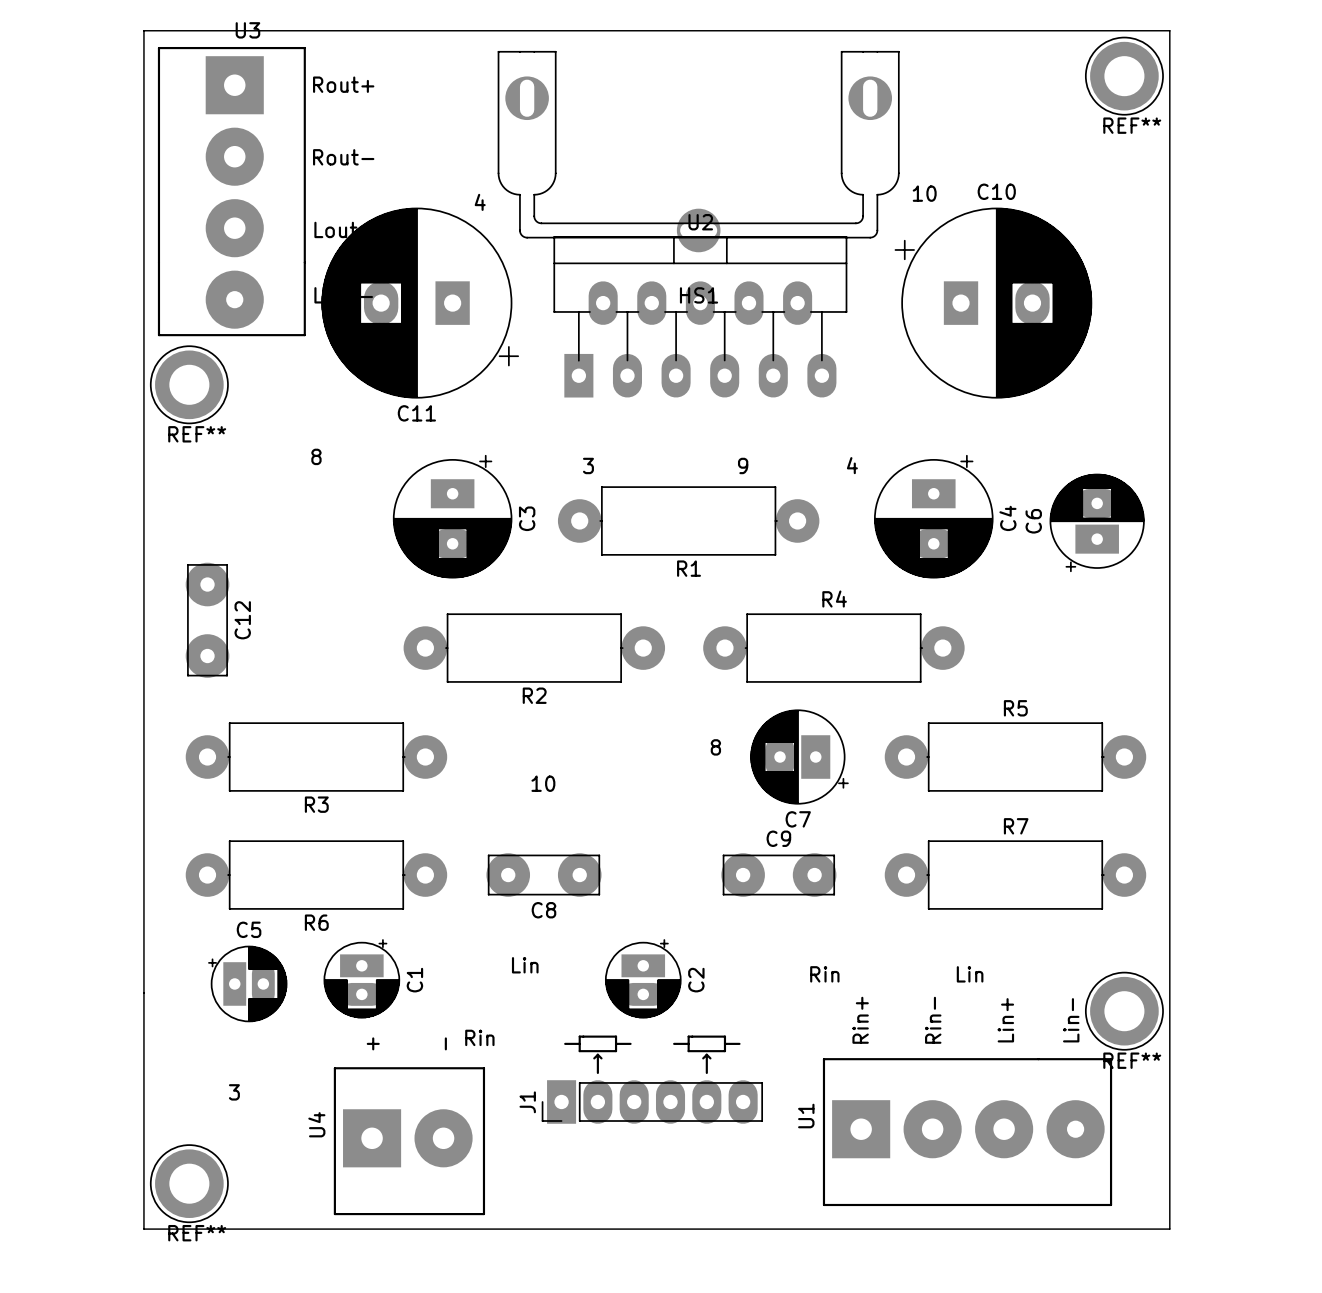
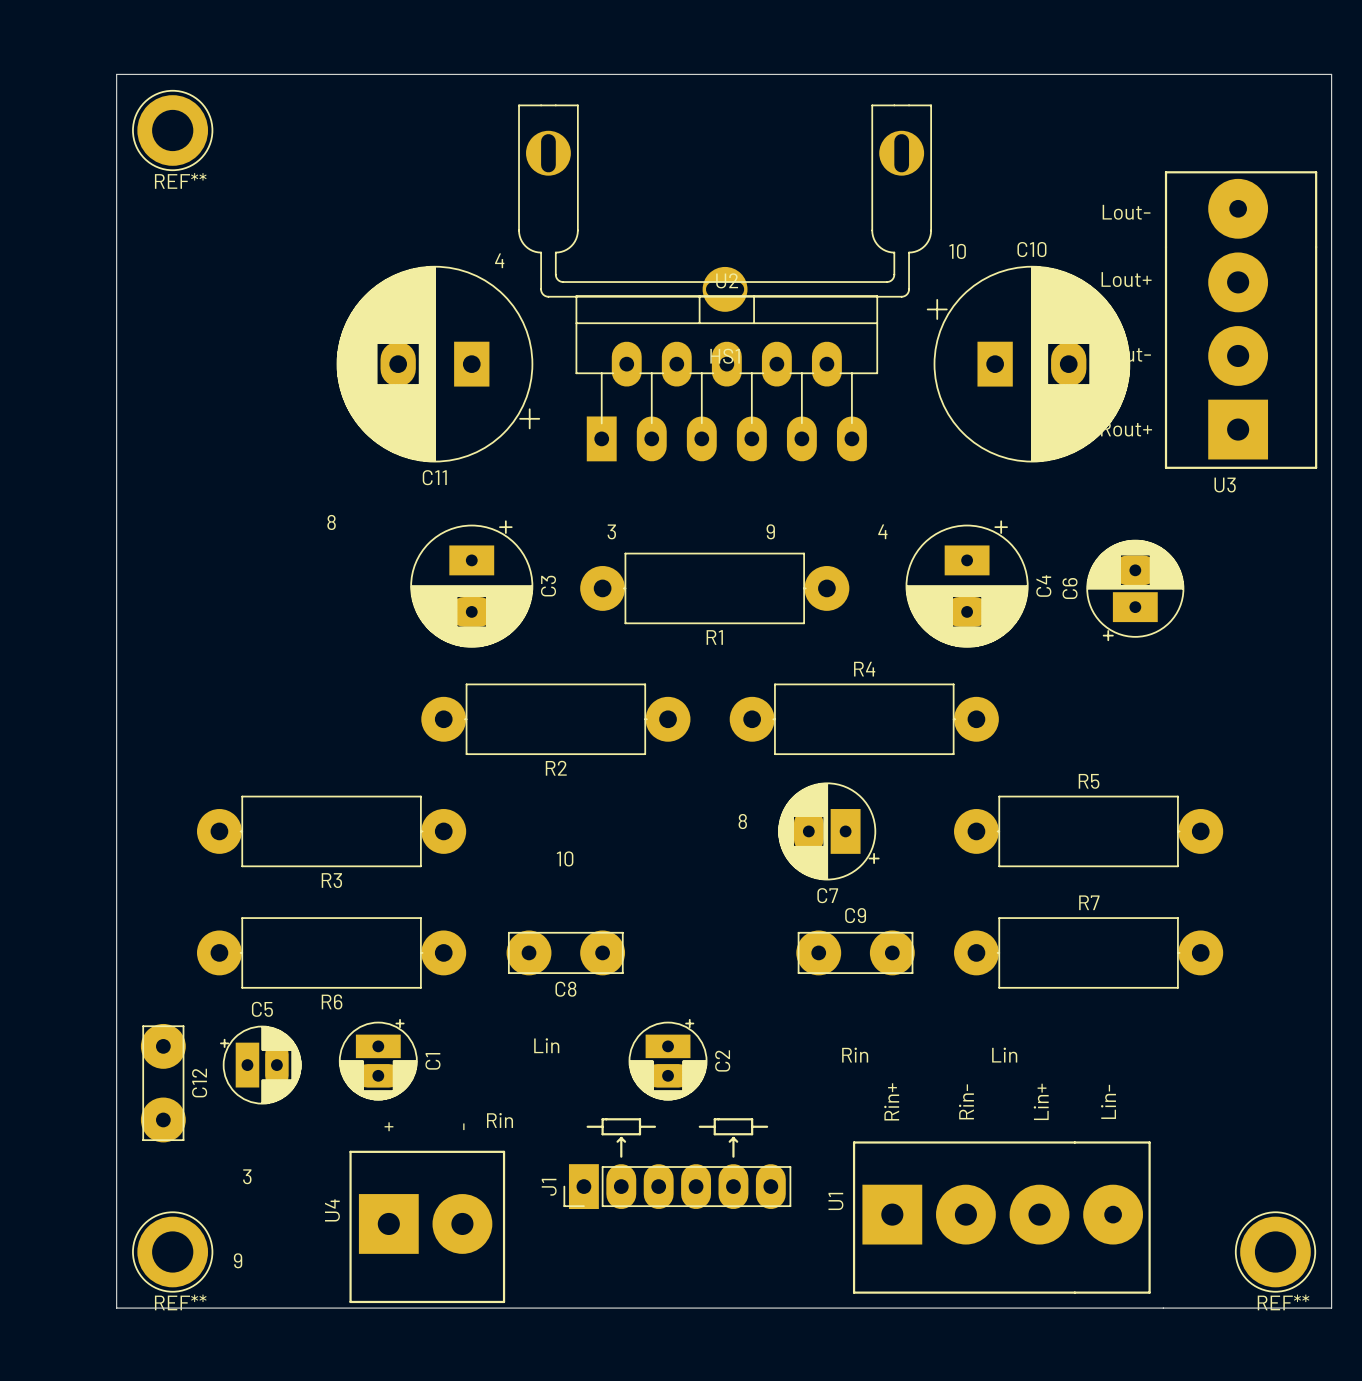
board edge: (143, 30) (143, 1229) (1169, 1229) (1169, 30) (143, 30) -> (116, 74) (116, 1308) (1331, 1308) (1331, 74) (116, 74)
REF**: (1124, 76) -> none
U3 rotation: 0° (231, 191) -> 180° (1241, 320)
U3 position: (231, 191) -> (1241, 320)
REF** position: (189, 384) -> (172, 130)
C12 position: (207, 620) -> (163, 1083)
R5 position: (1015, 757) -> (1088, 831)
C9 position: (778, 875) -> (855, 952)
R7 position: (1015, 875) -> (1088, 952)
REF** position: (1124, 1011) -> (1275, 1252)
text: none -> 9 (238, 1260)
REF** position: (189, 1183) -> (172, 1252)

